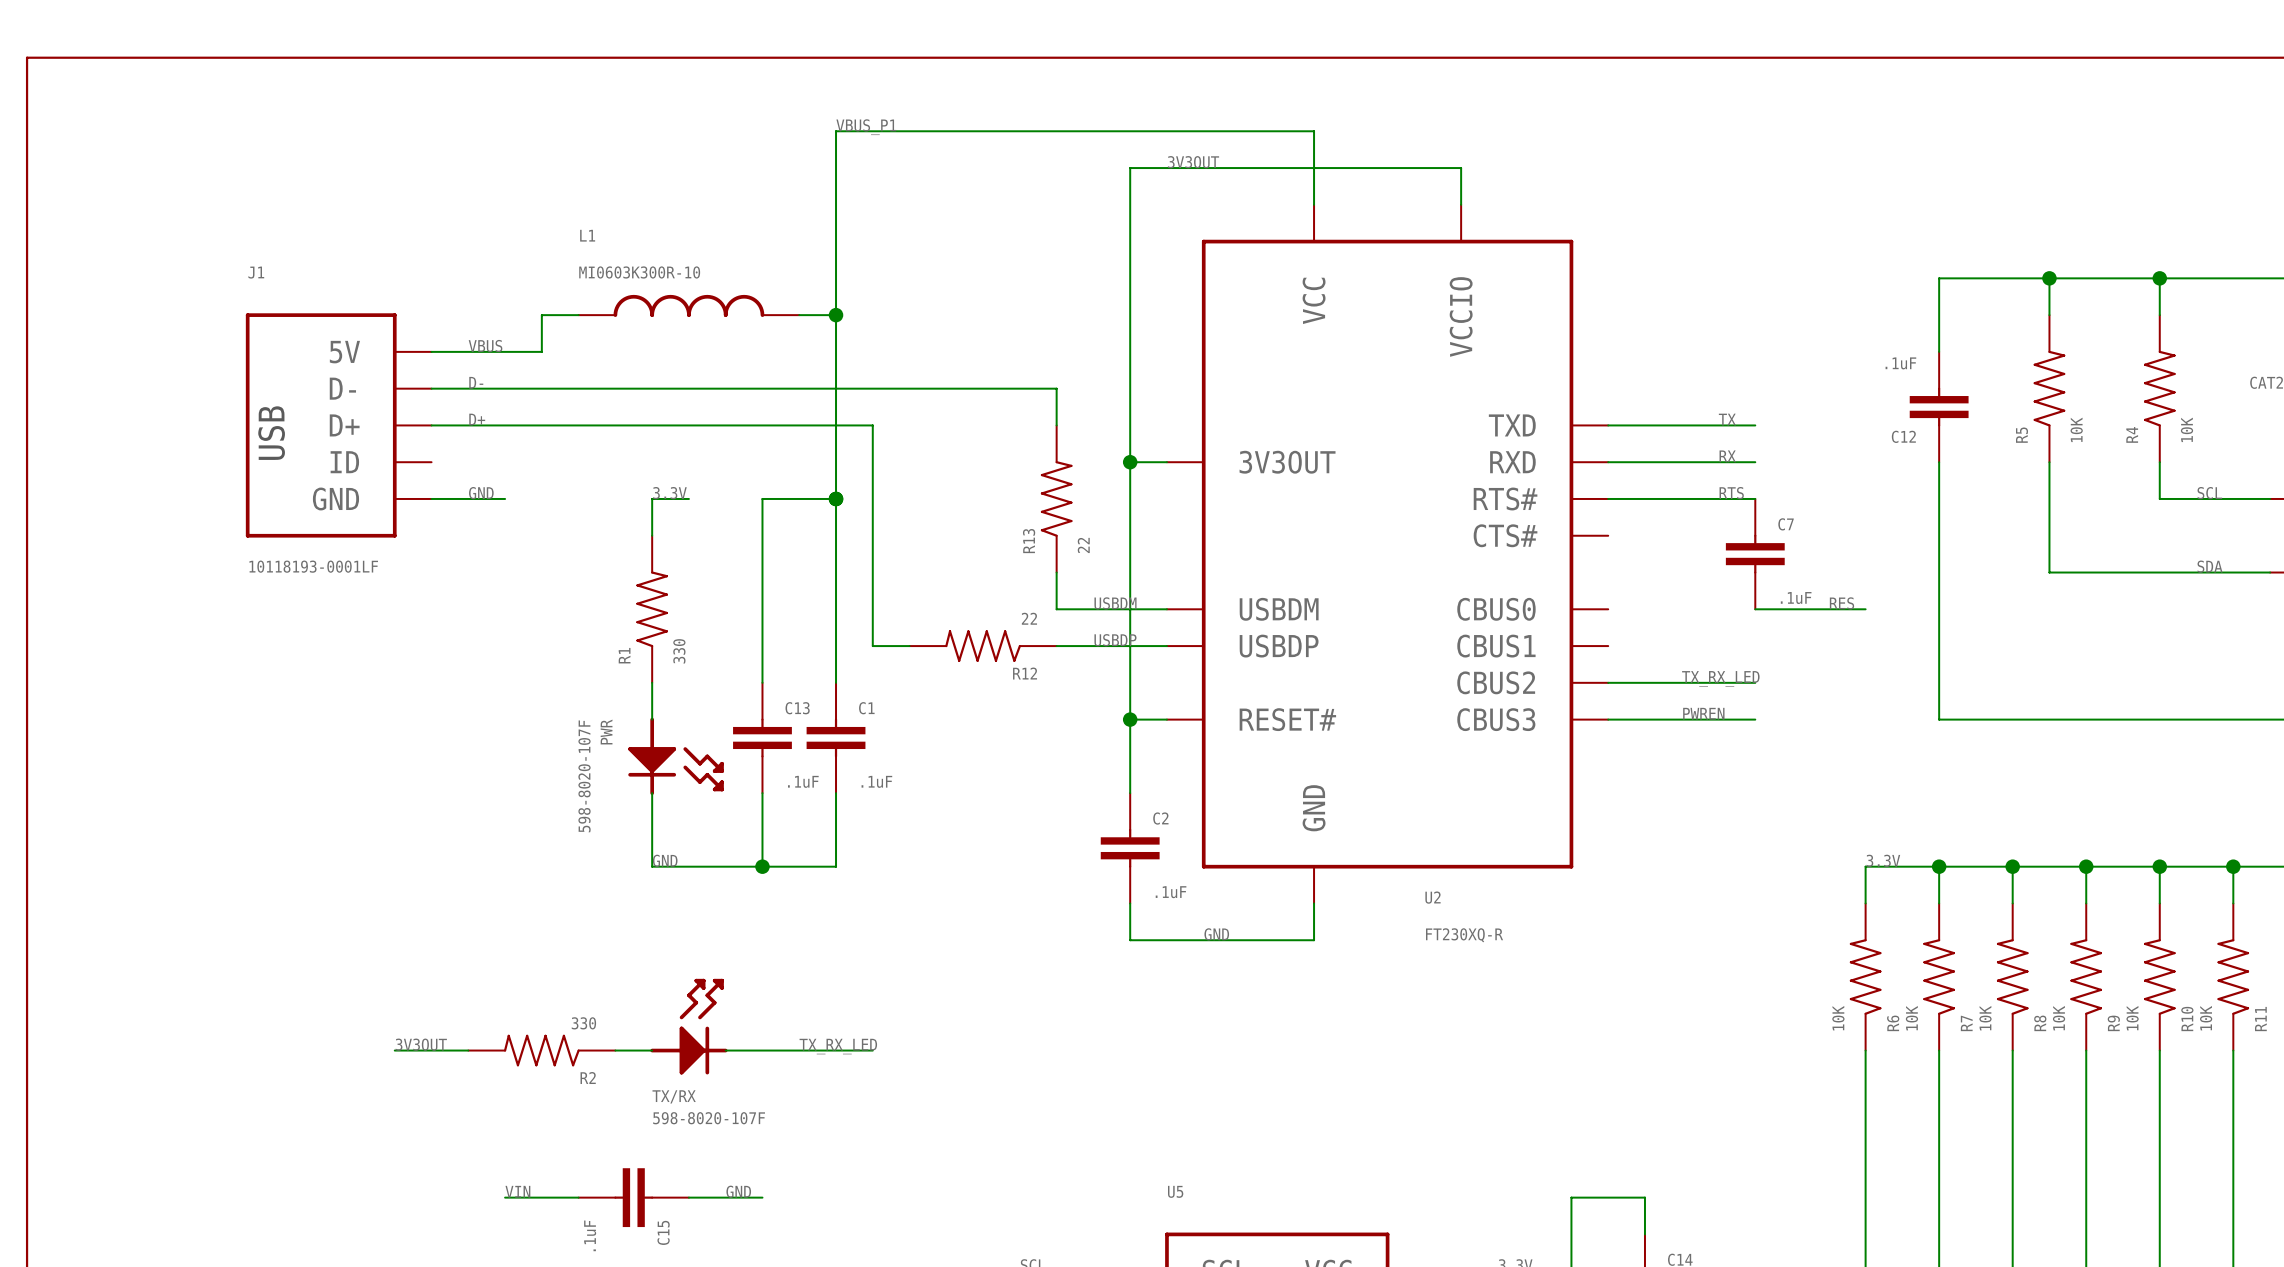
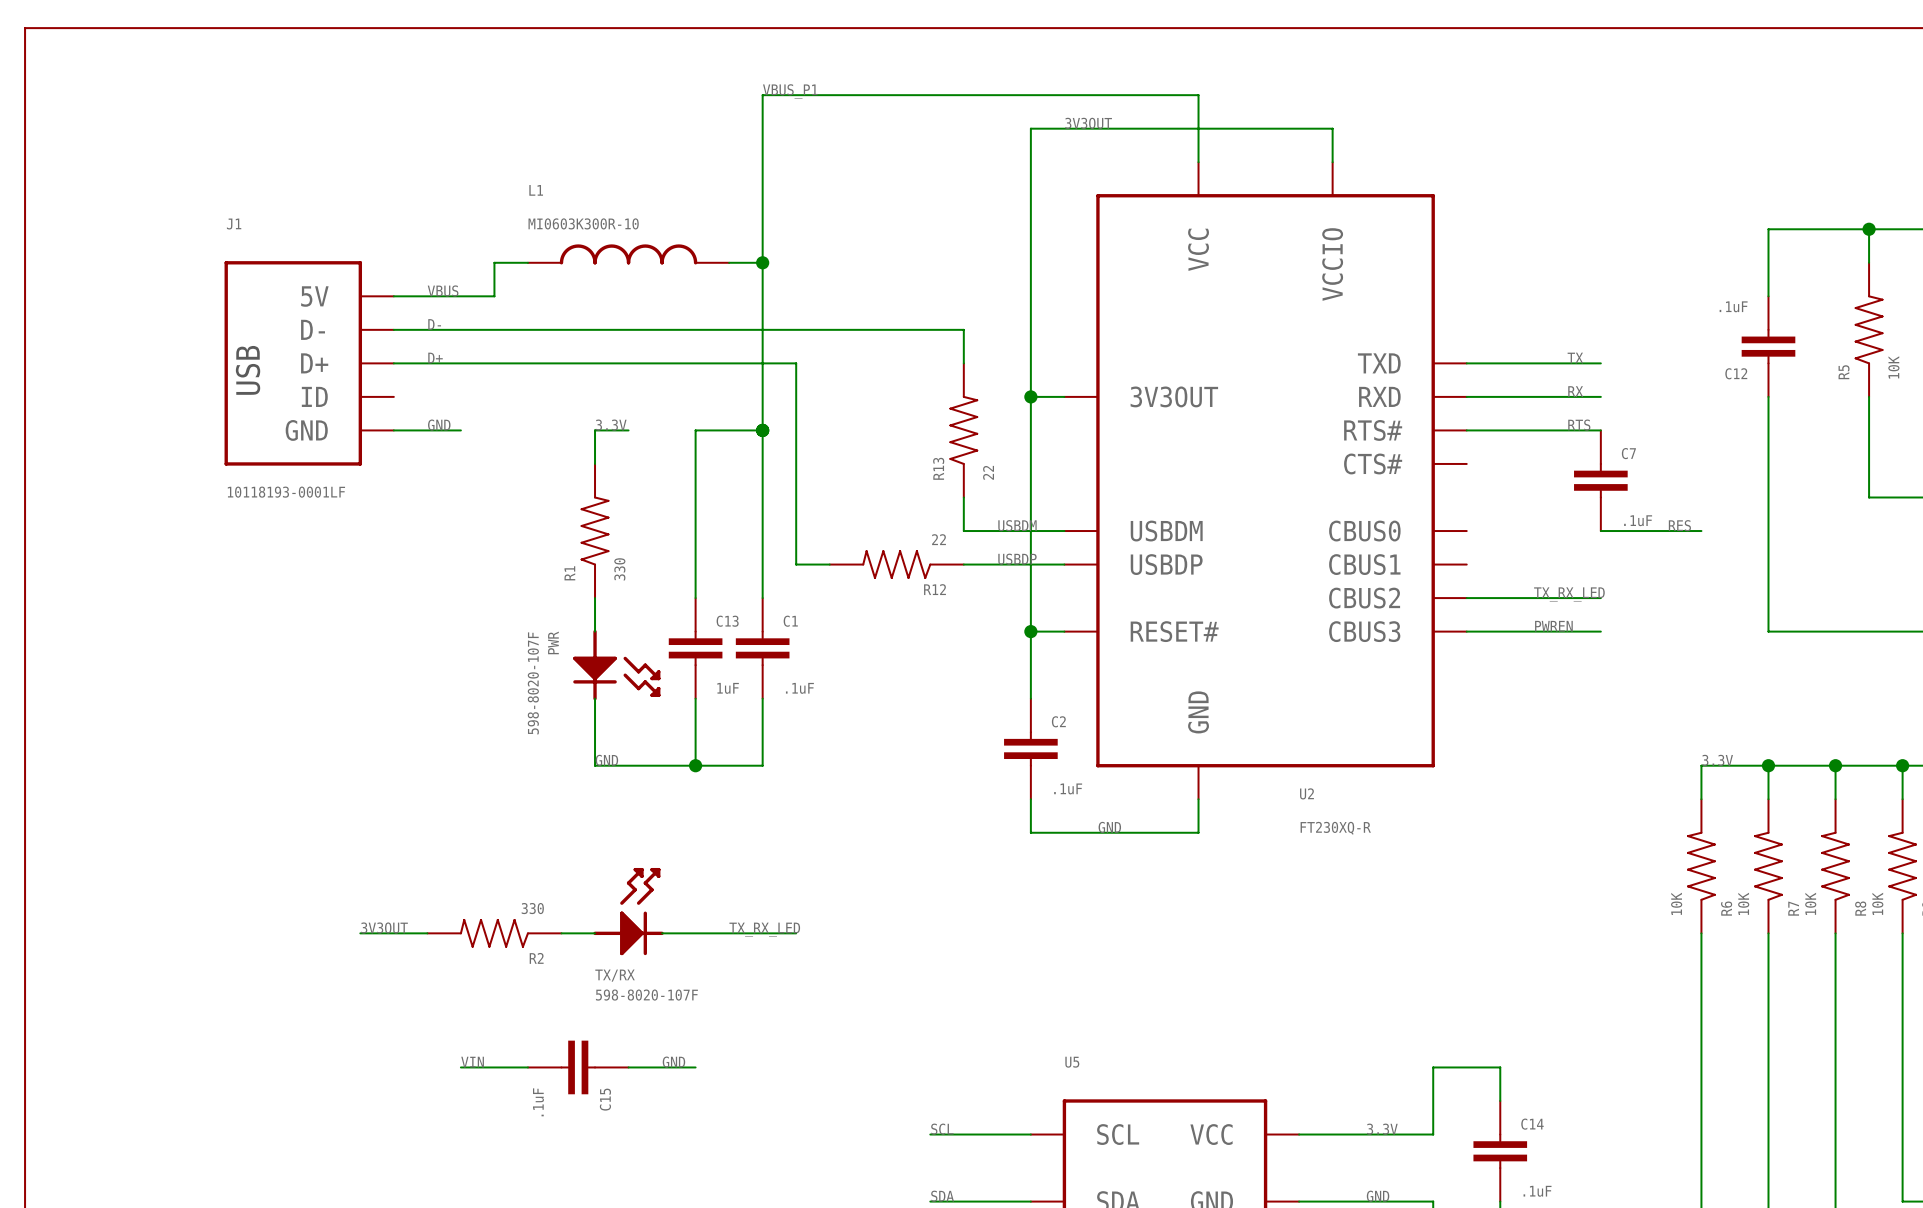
C13 value: .1uF (803, 781) -> 1uF (728, 688)

